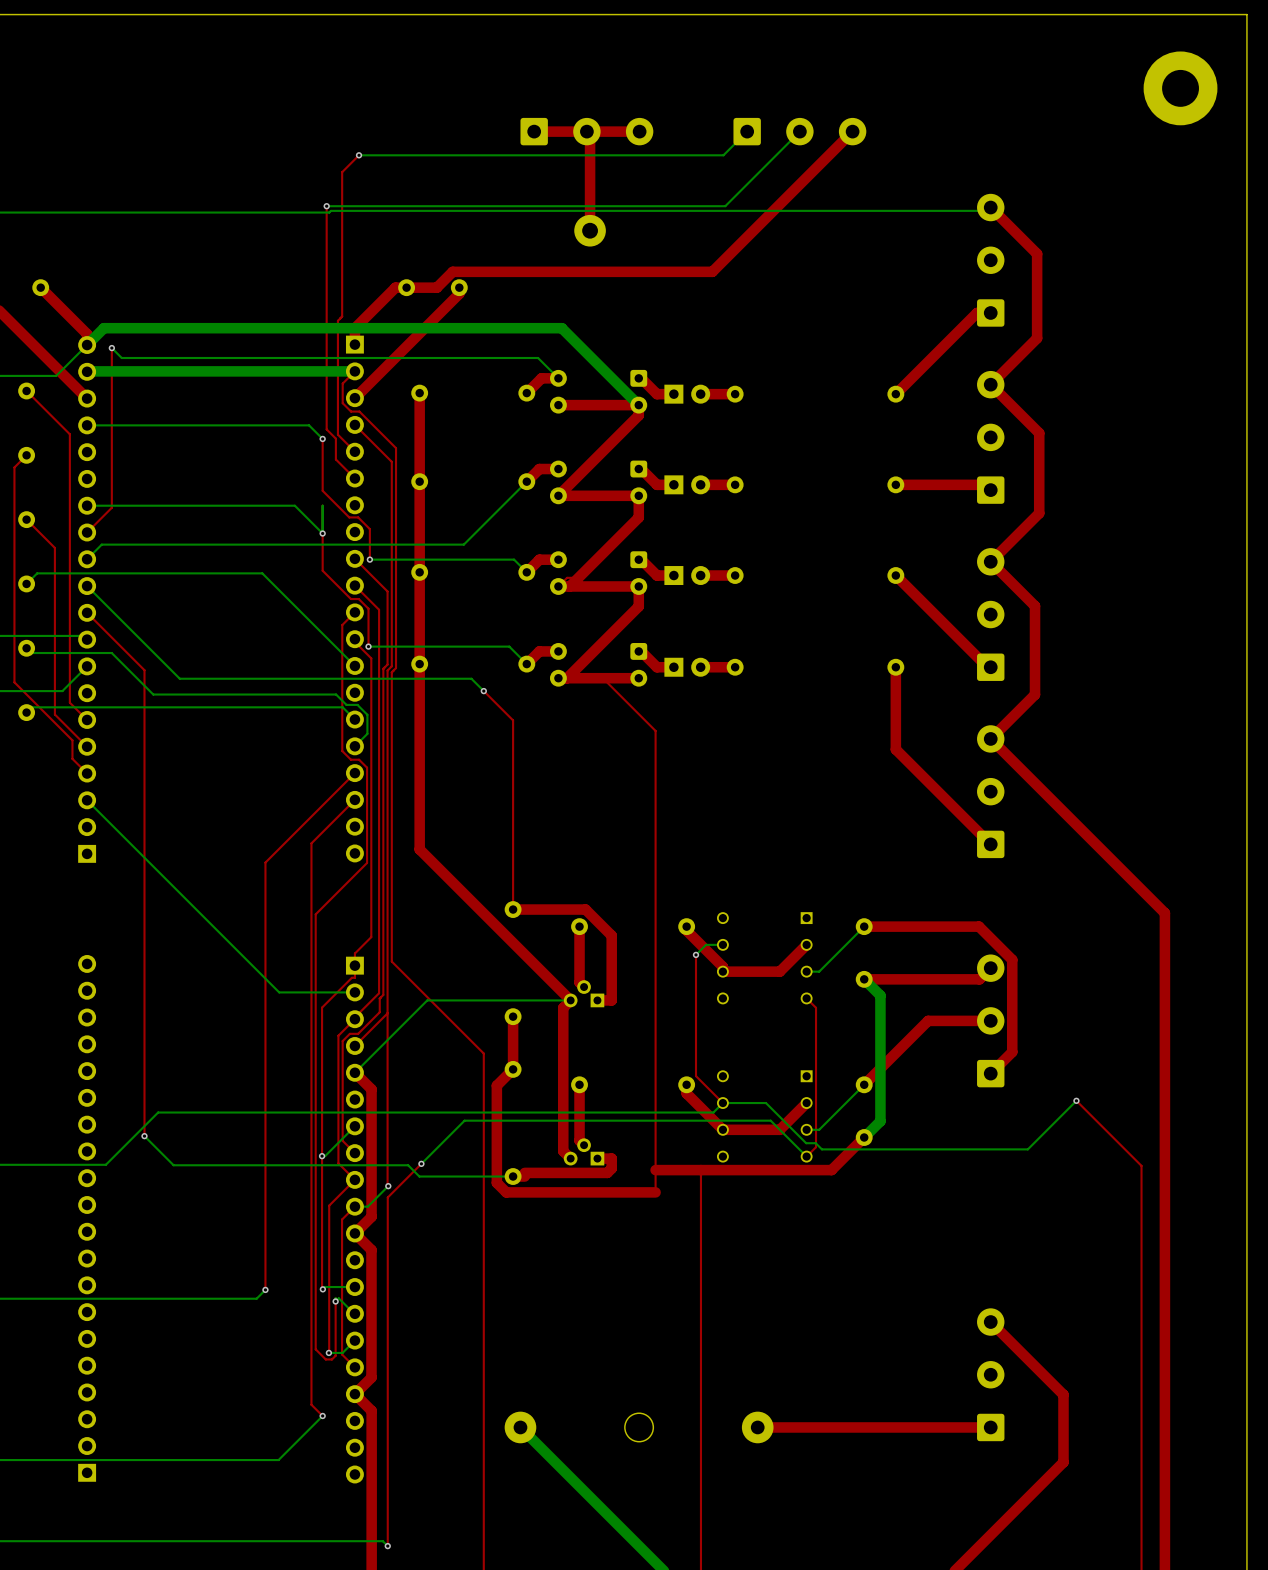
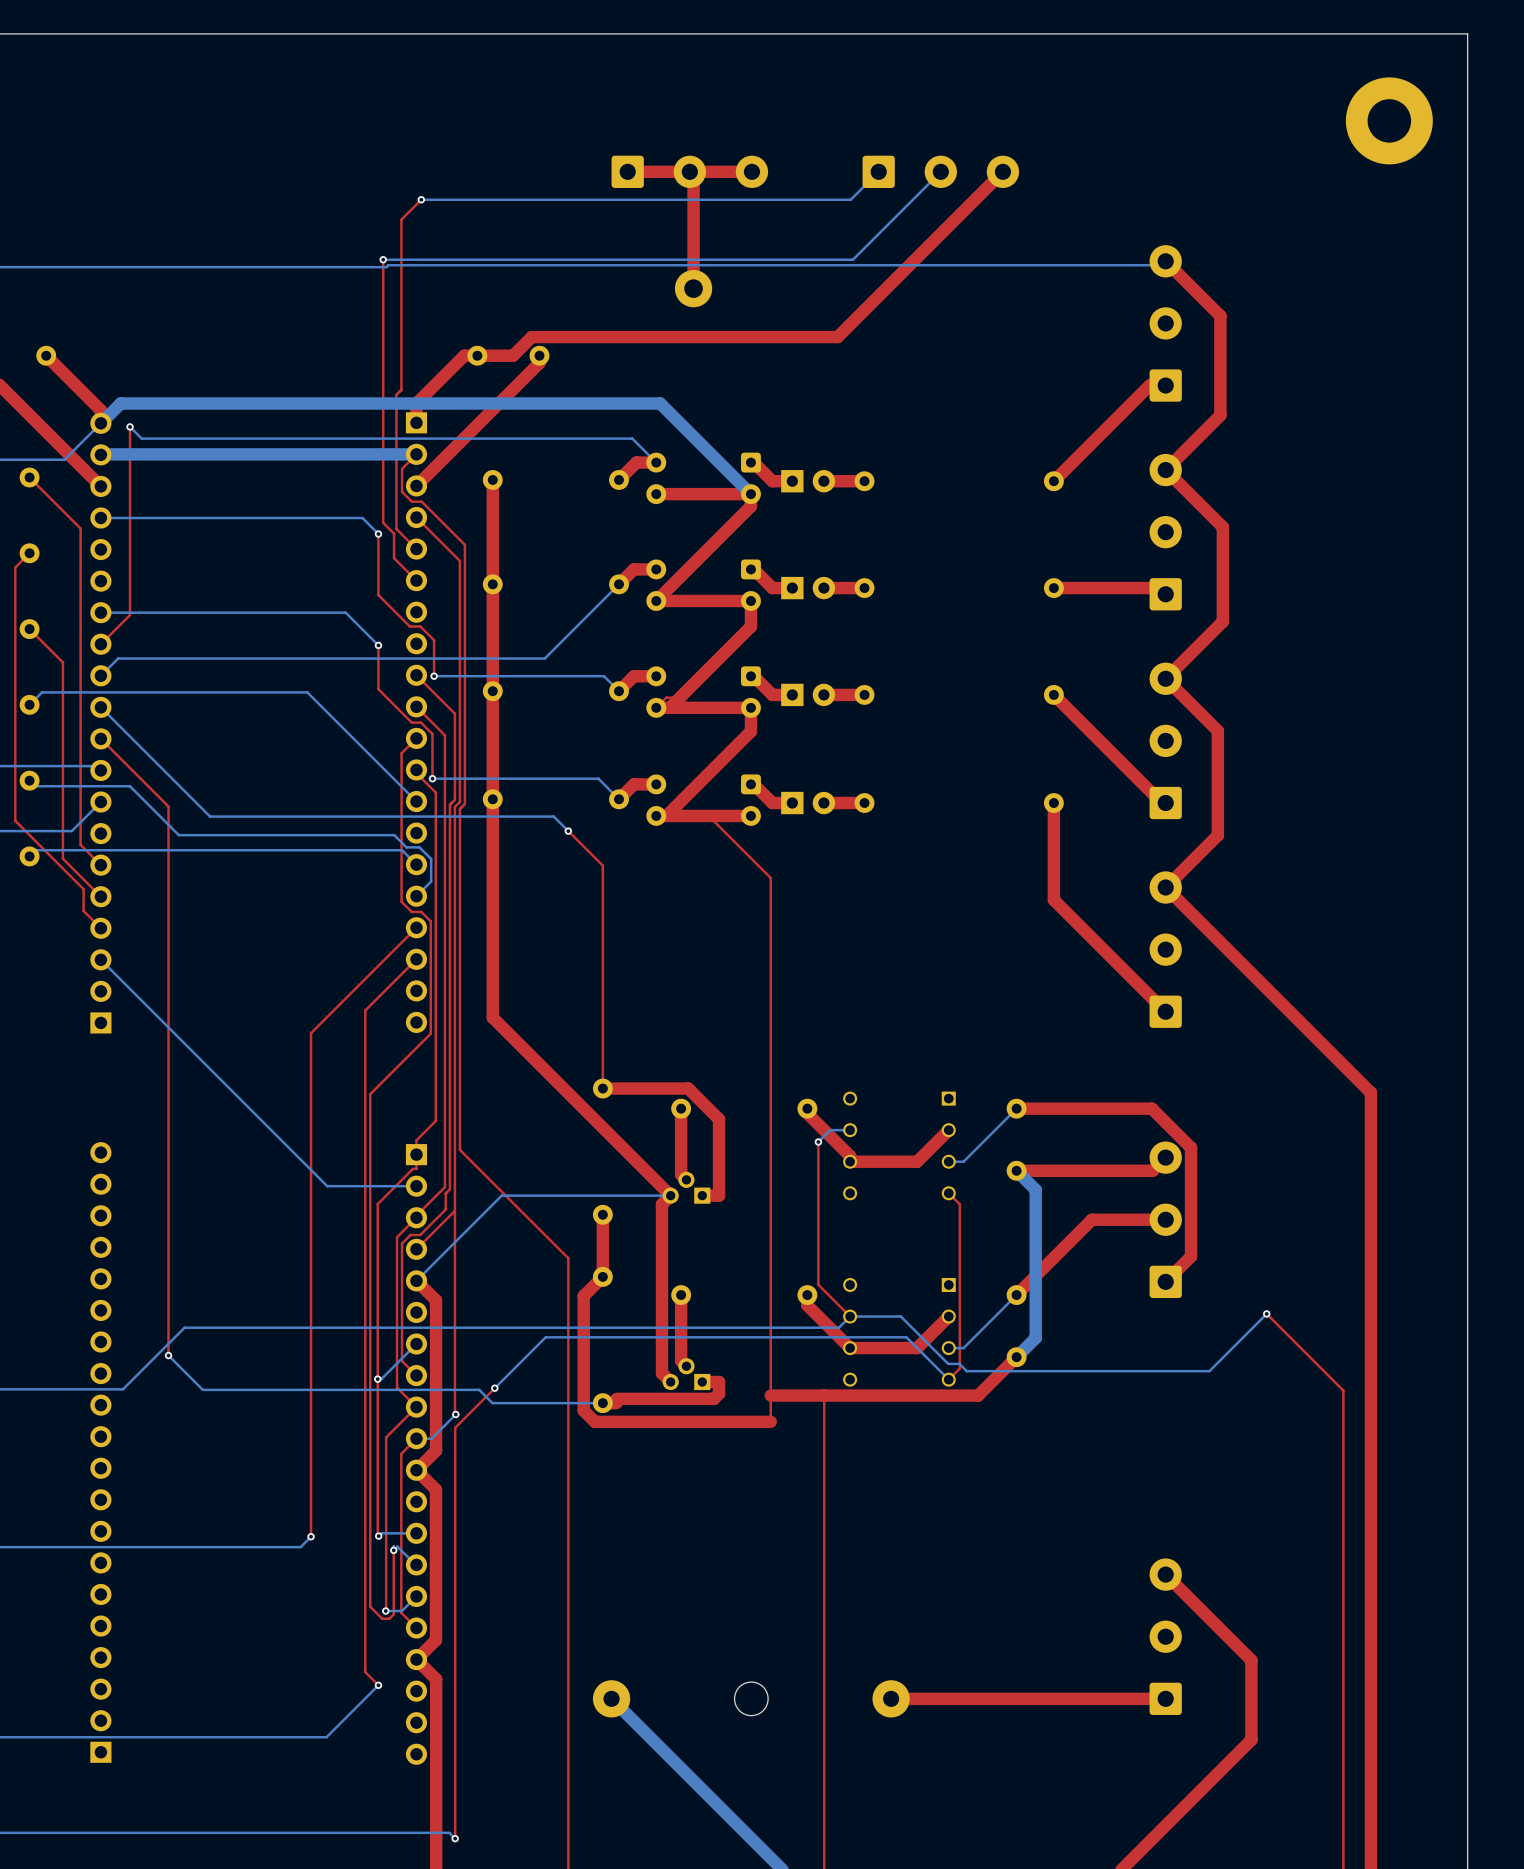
bottom track: (322, 505) (322, 533) -> none

